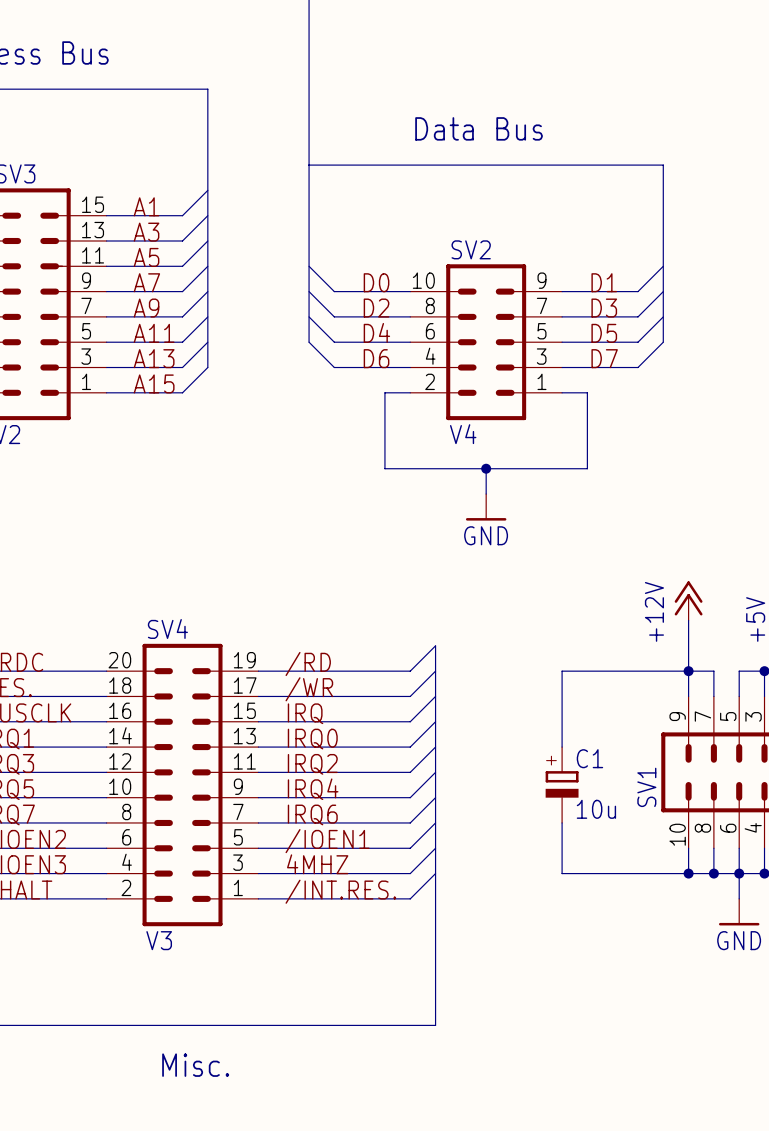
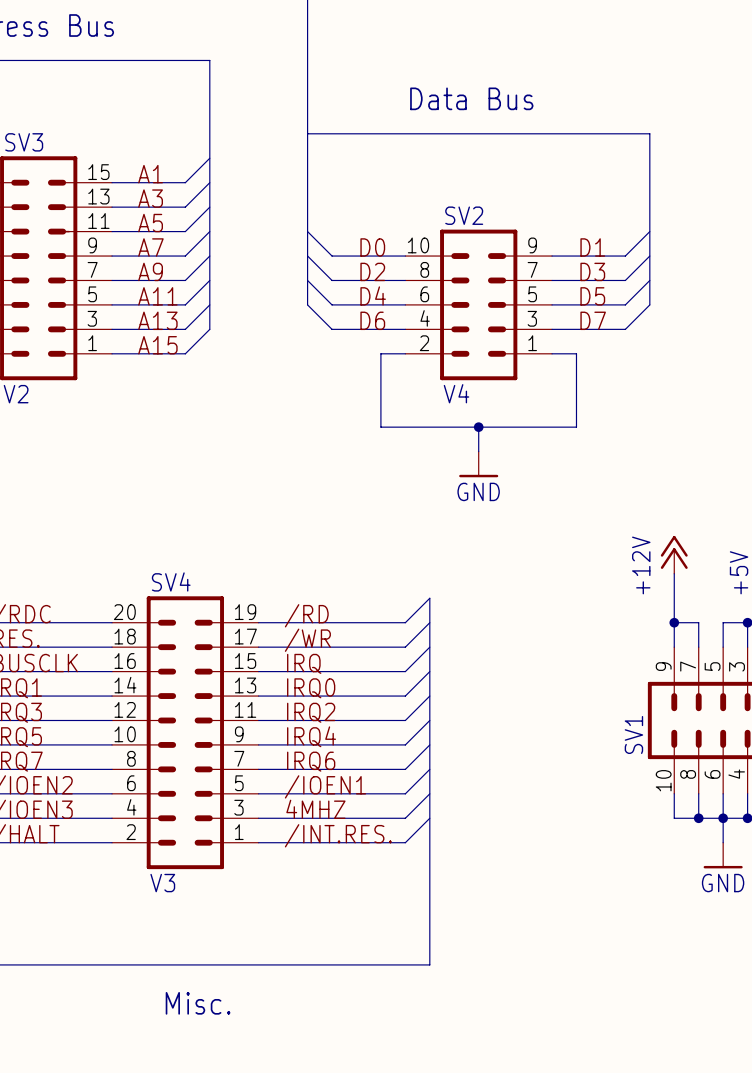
wire: (688, 671) (562, 671) (562, 747) -> none
C1: 10u (562, 785) -> none
wire: (562, 822) (562, 873) (688, 873) -> none
junction: (688, 873) -> none

